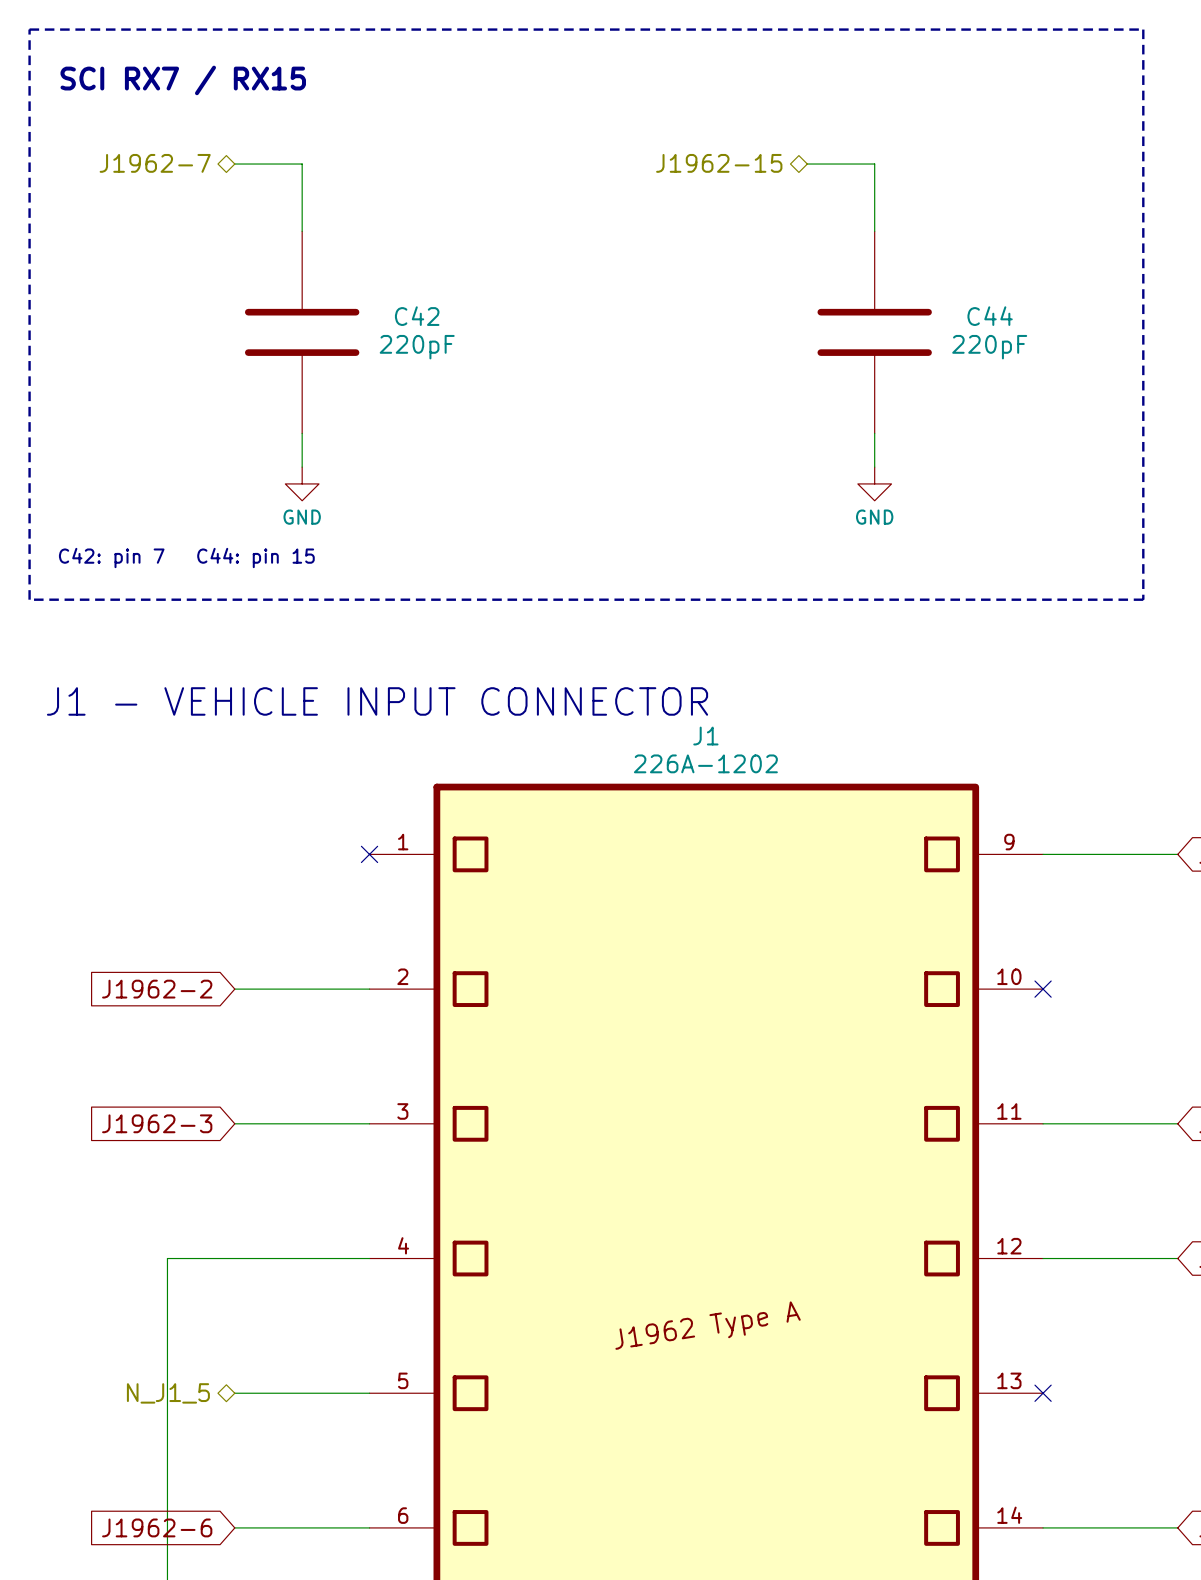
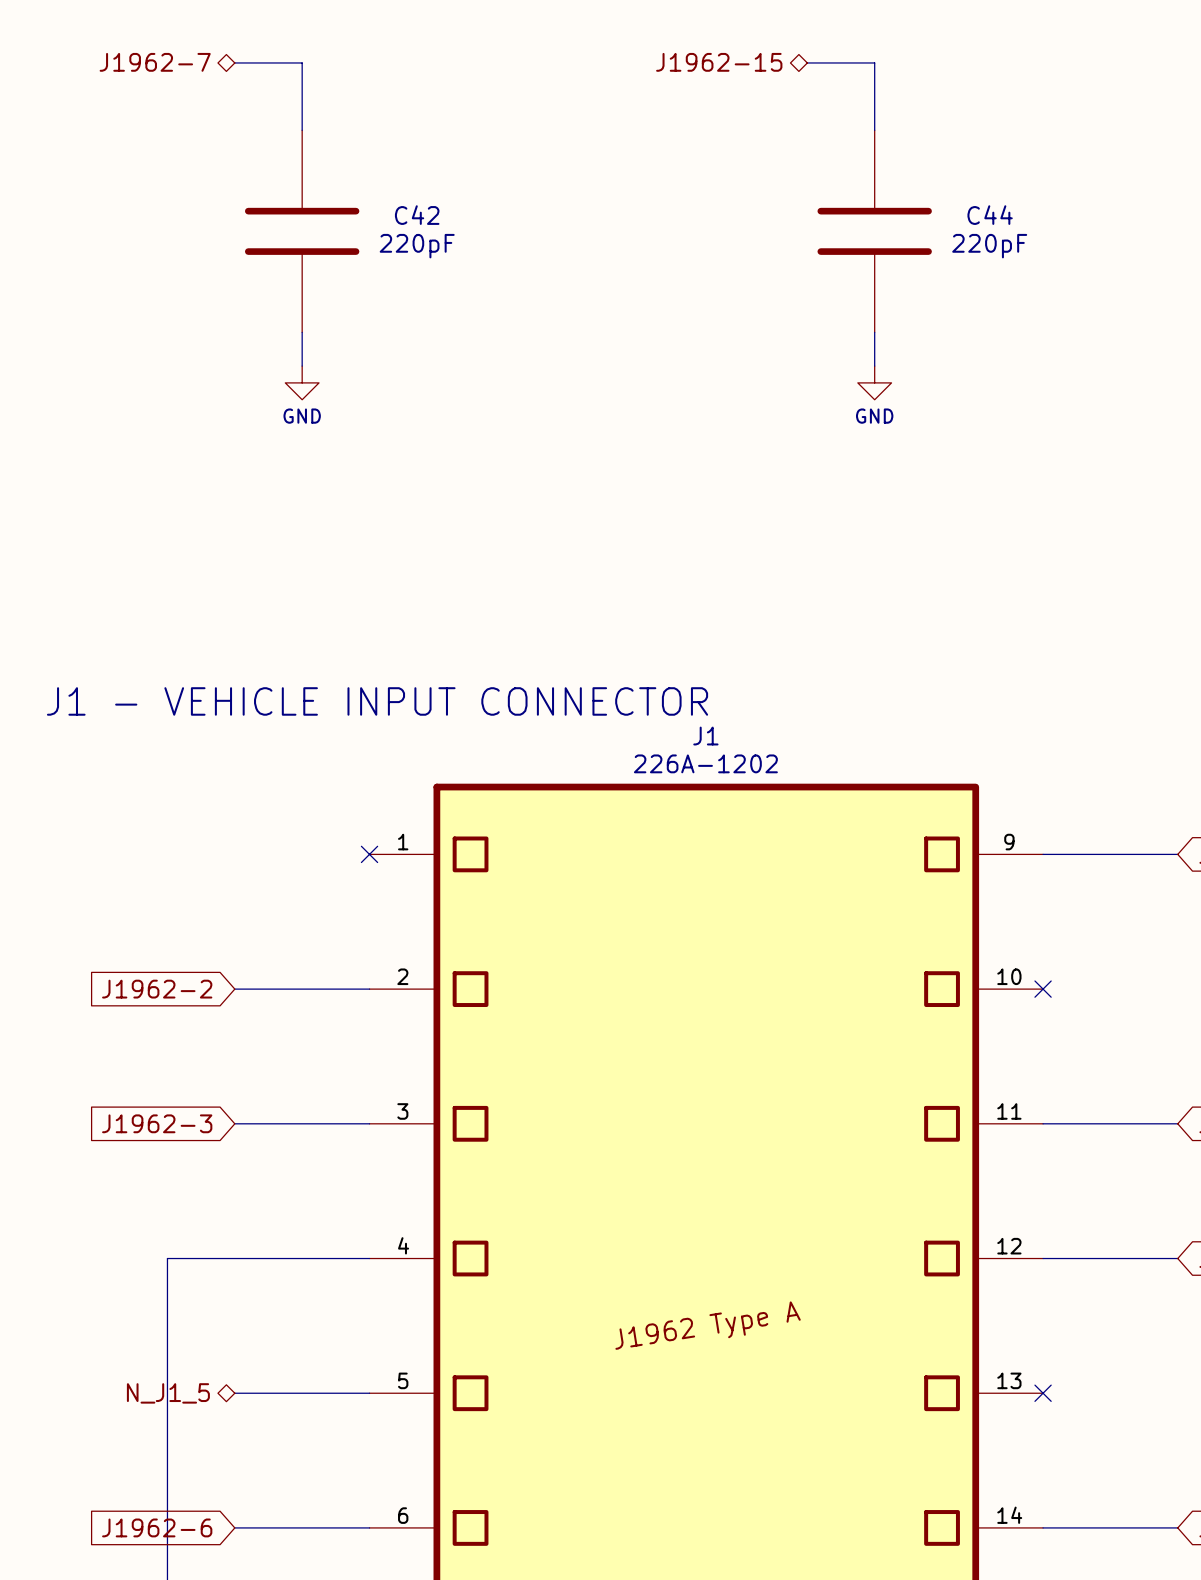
line: (29, 29) (1143, 29) (1143, 599) (29, 599) (29, 29) -> none
text: SCI RX7 / RX15 (183, 80) -> none
hierarchical label position: J1962-7 (155, 163) -> J1962-7 (155, 62)
hierarchical label position: J1962-15 (719, 163) -> J1962-15 (719, 62)
wire: (234, 164) (302, 164) (302, 231) -> (234, 62) (302, 62) (302, 130)
wire: (807, 164) (874, 164) (874, 231) -> (807, 62) (874, 62) (874, 130)
C42 position: (302, 332) -> (302, 231)
C44 position: (874, 332) -> (874, 231)
wire: (302, 433) (302, 467) -> (302, 332) (302, 366)
wire: (874, 433) (874, 467) -> (874, 332) (874, 366)
power symbol position: GND (302, 483) -> GND (302, 382)
power symbol position: GND (874, 483) -> GND (874, 382)
text: C42: pin 7 C44: pin 15 (186, 558) -> none

